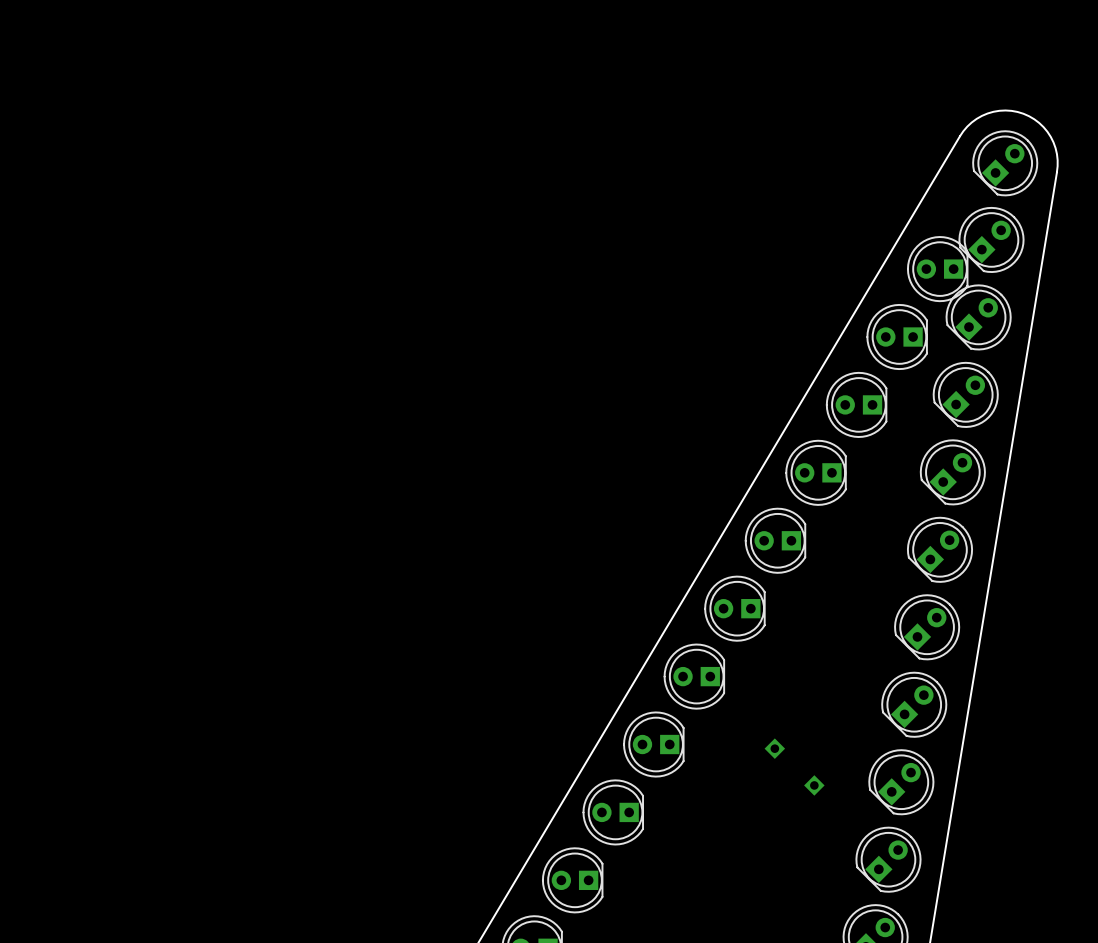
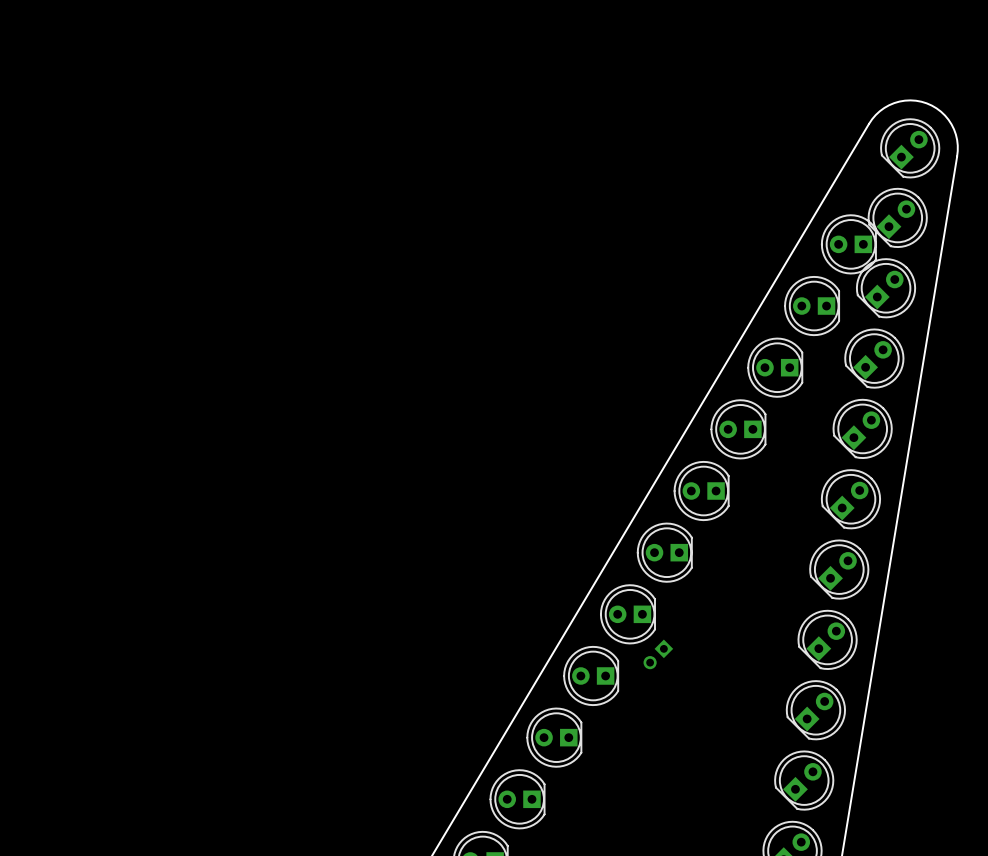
part: none -> (658, 654)
part: (774, 748) -> none
part: (814, 785) -> none

